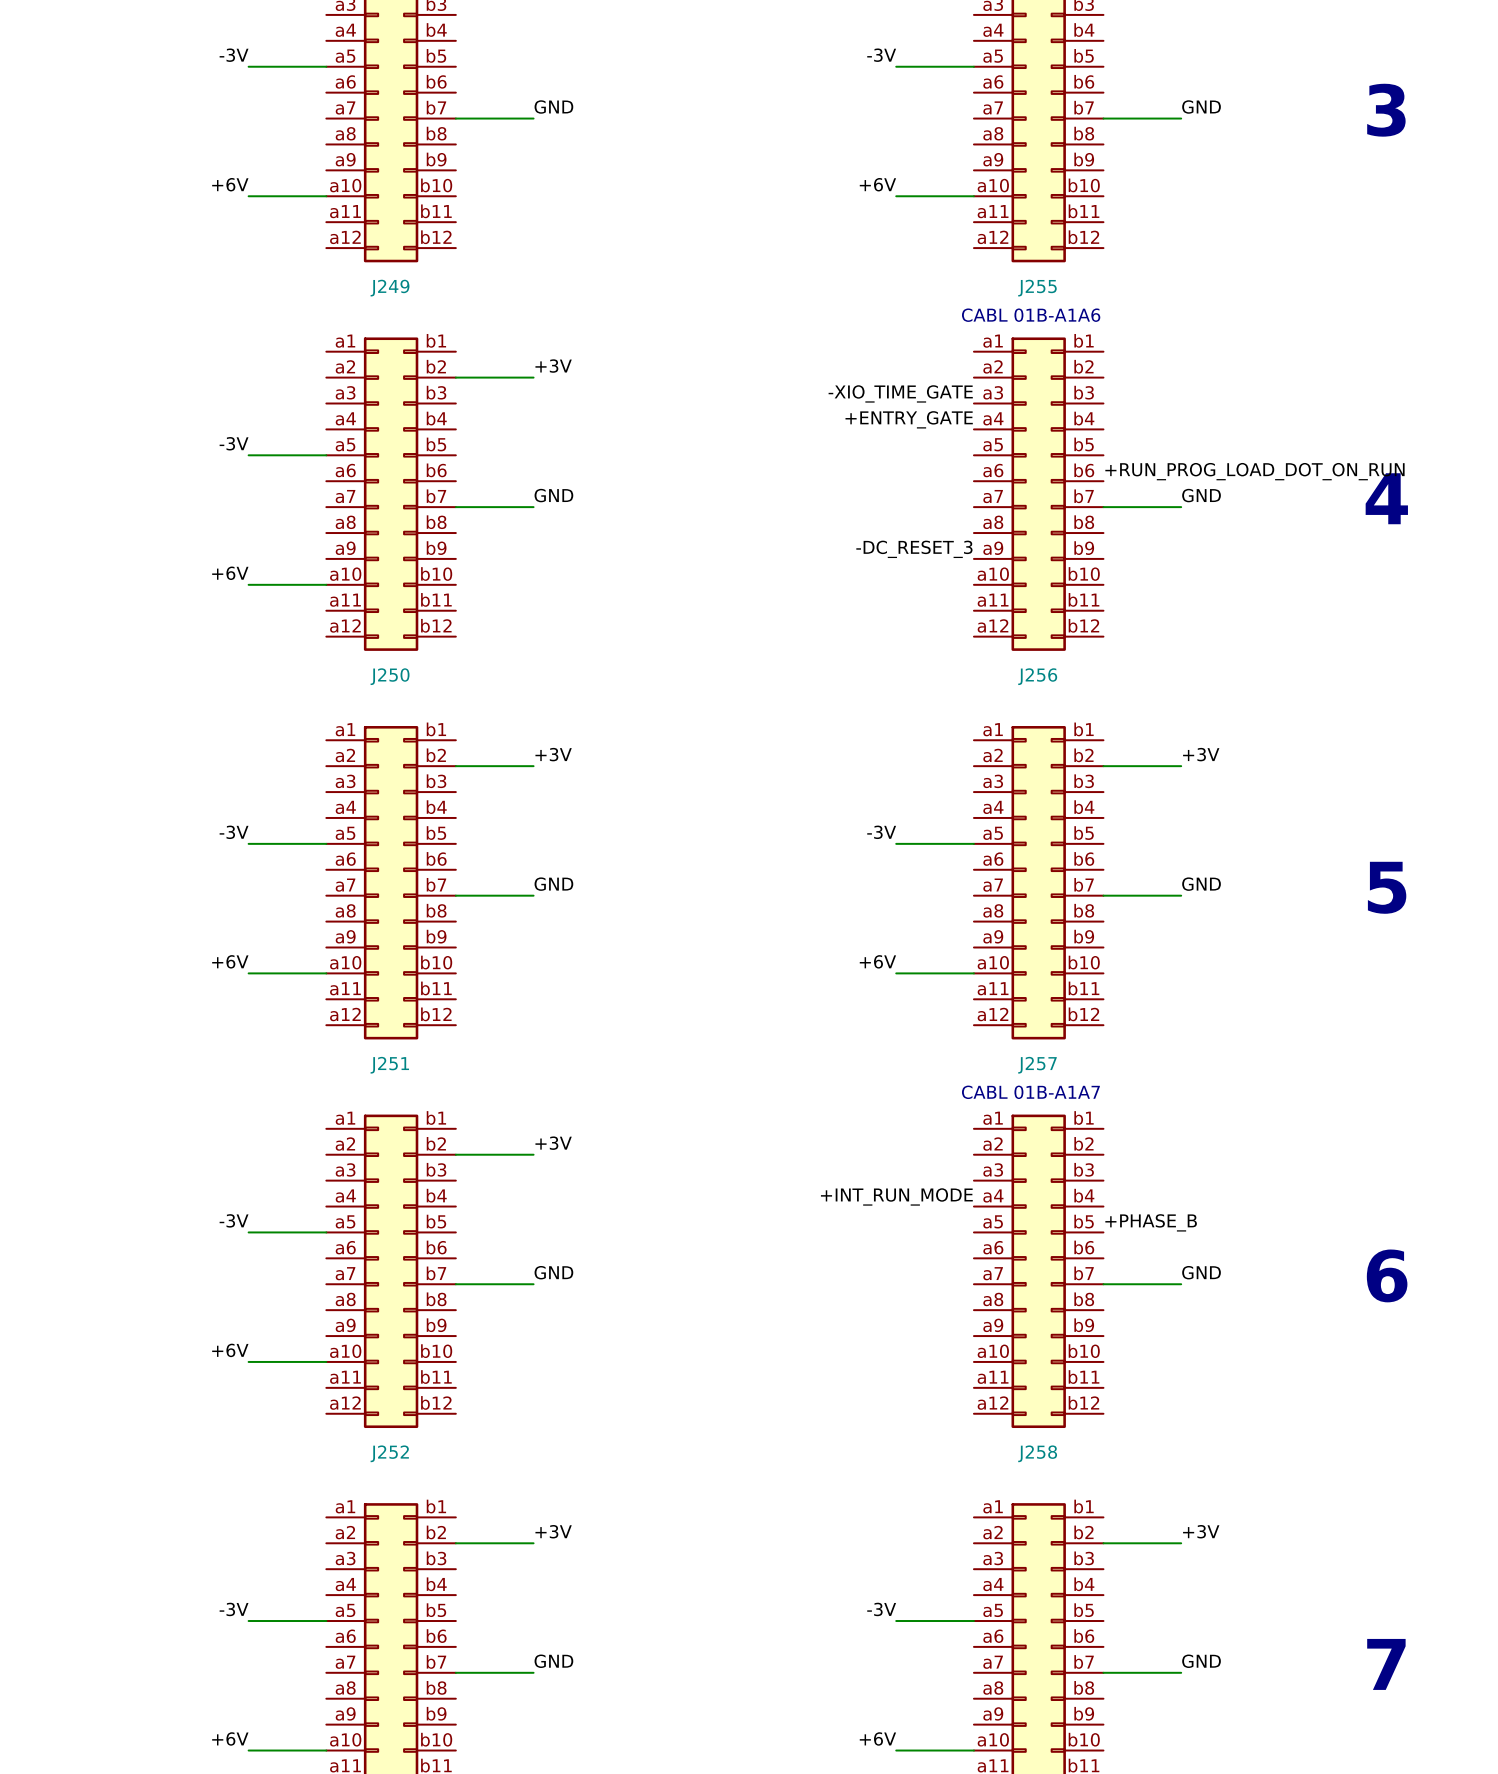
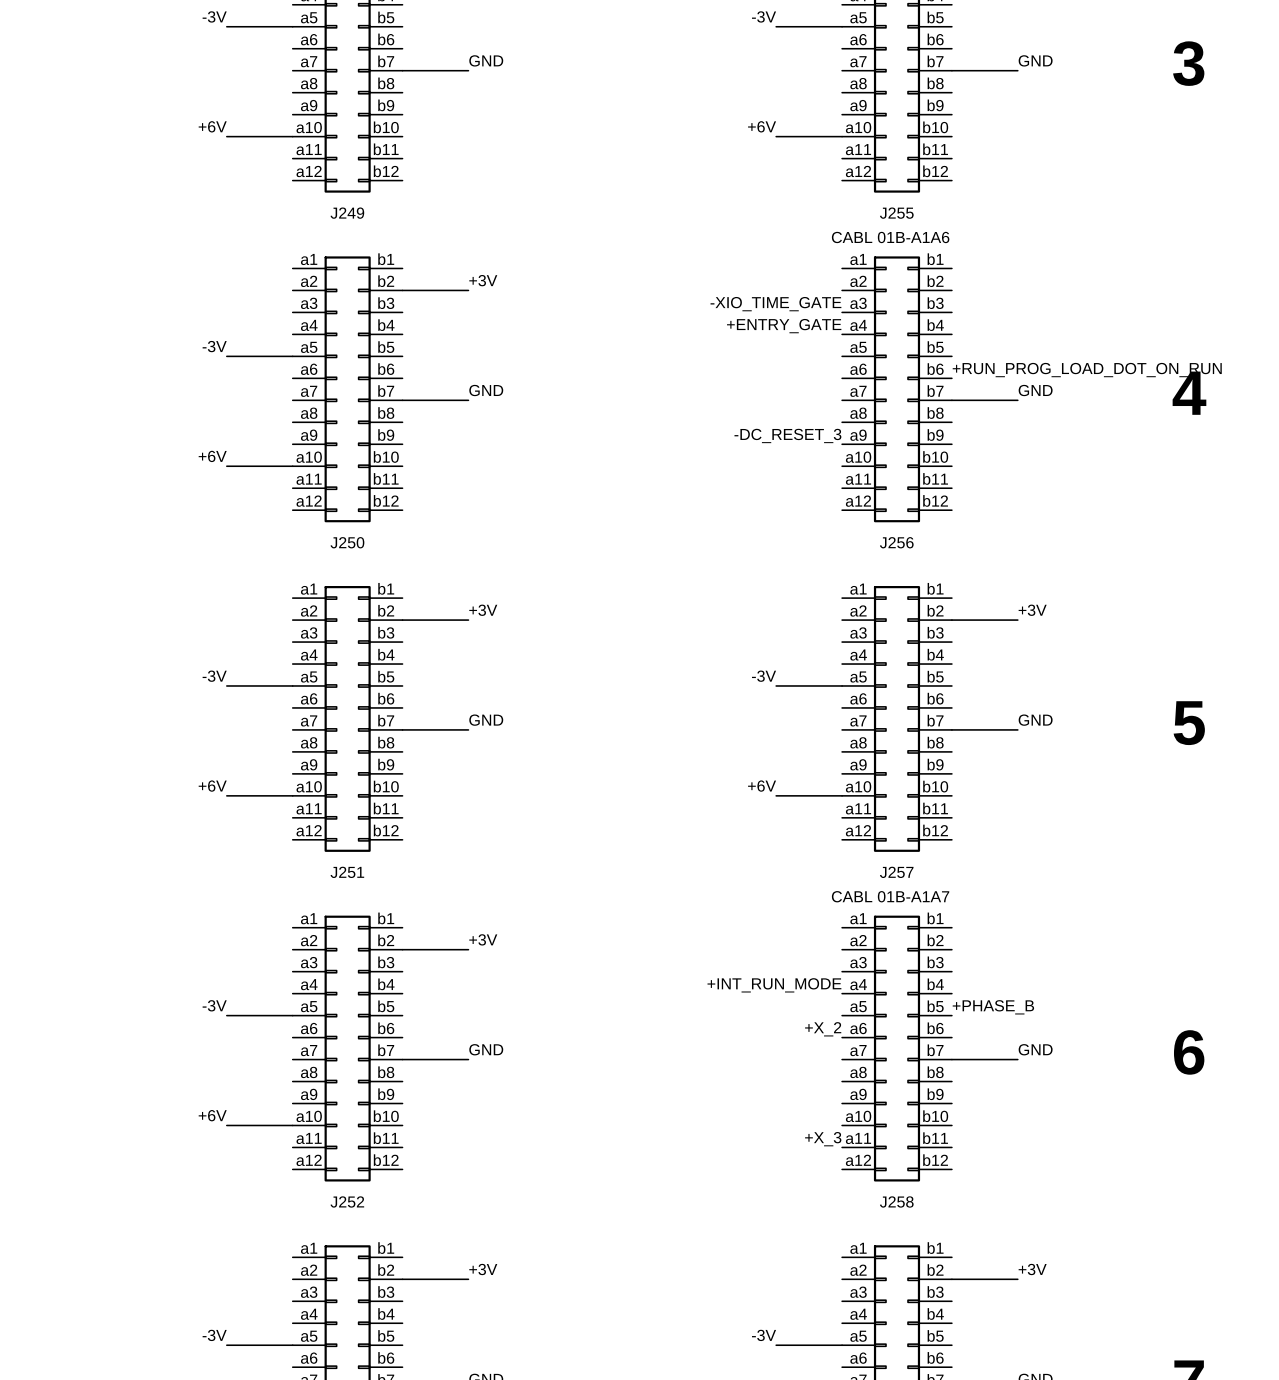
label: none -> +X_2 (823, 1029)
label: none -> +X_3 (823, 1139)

